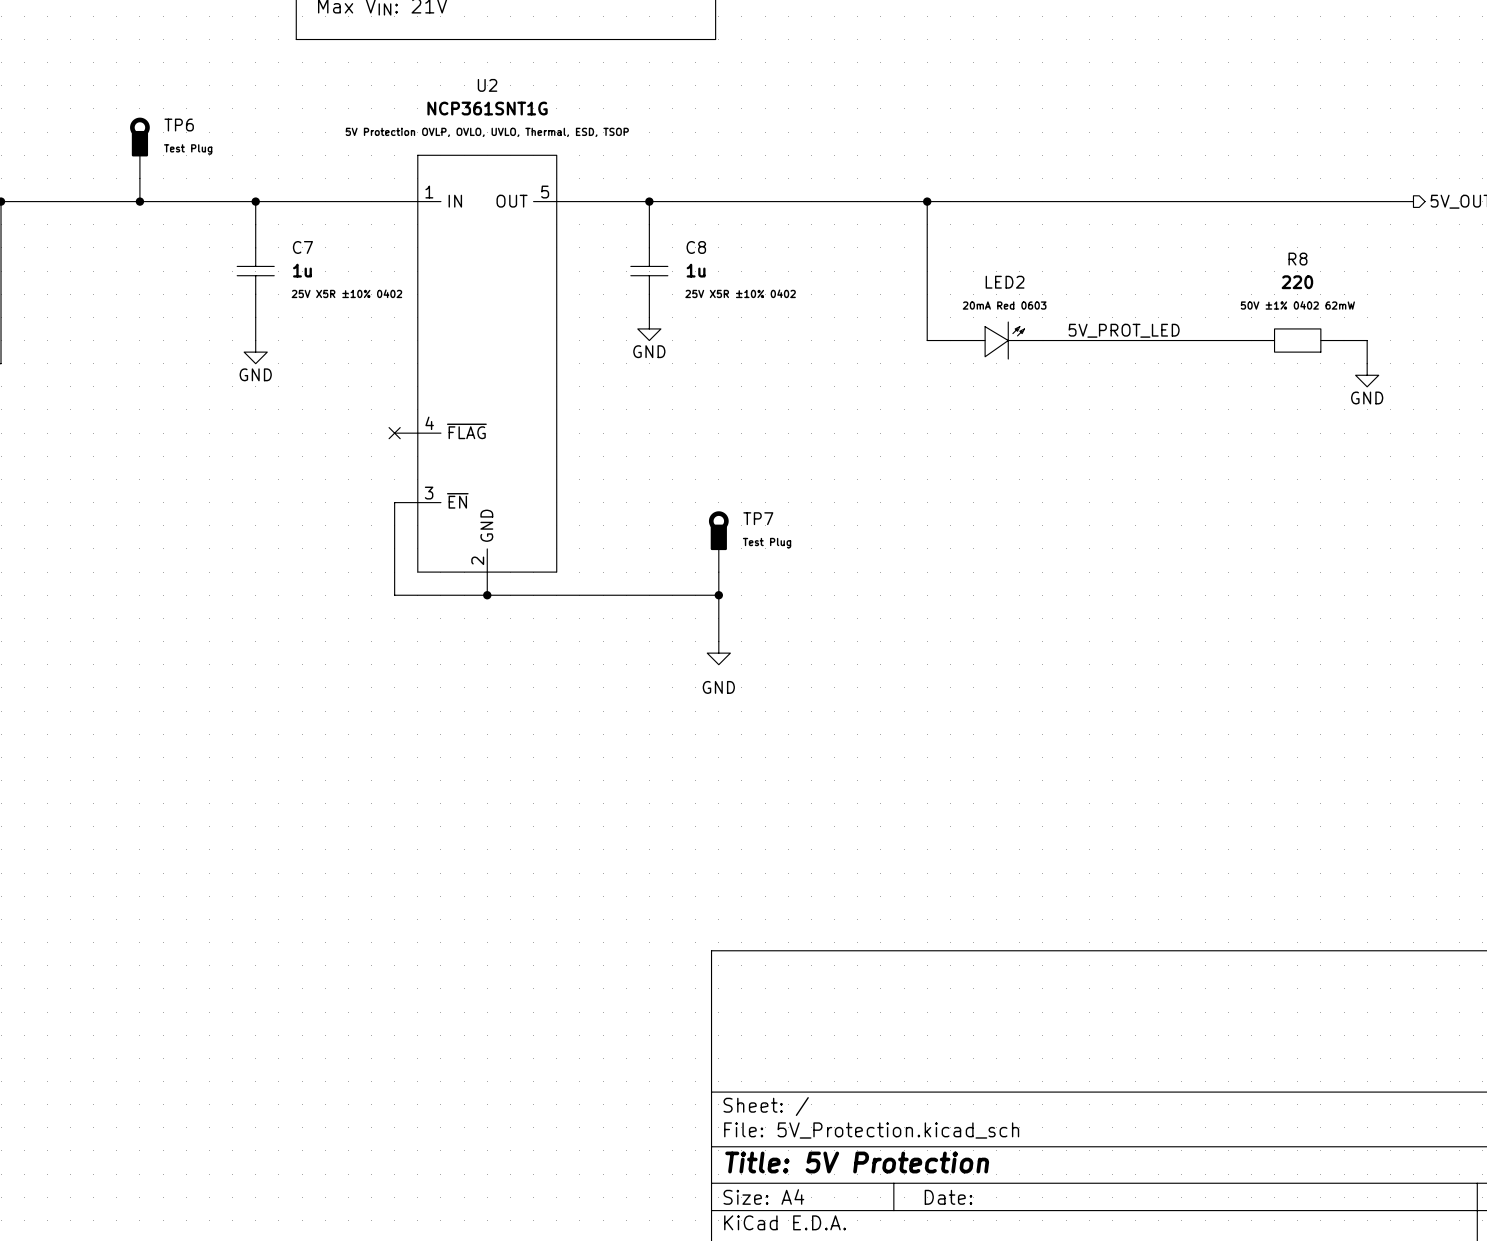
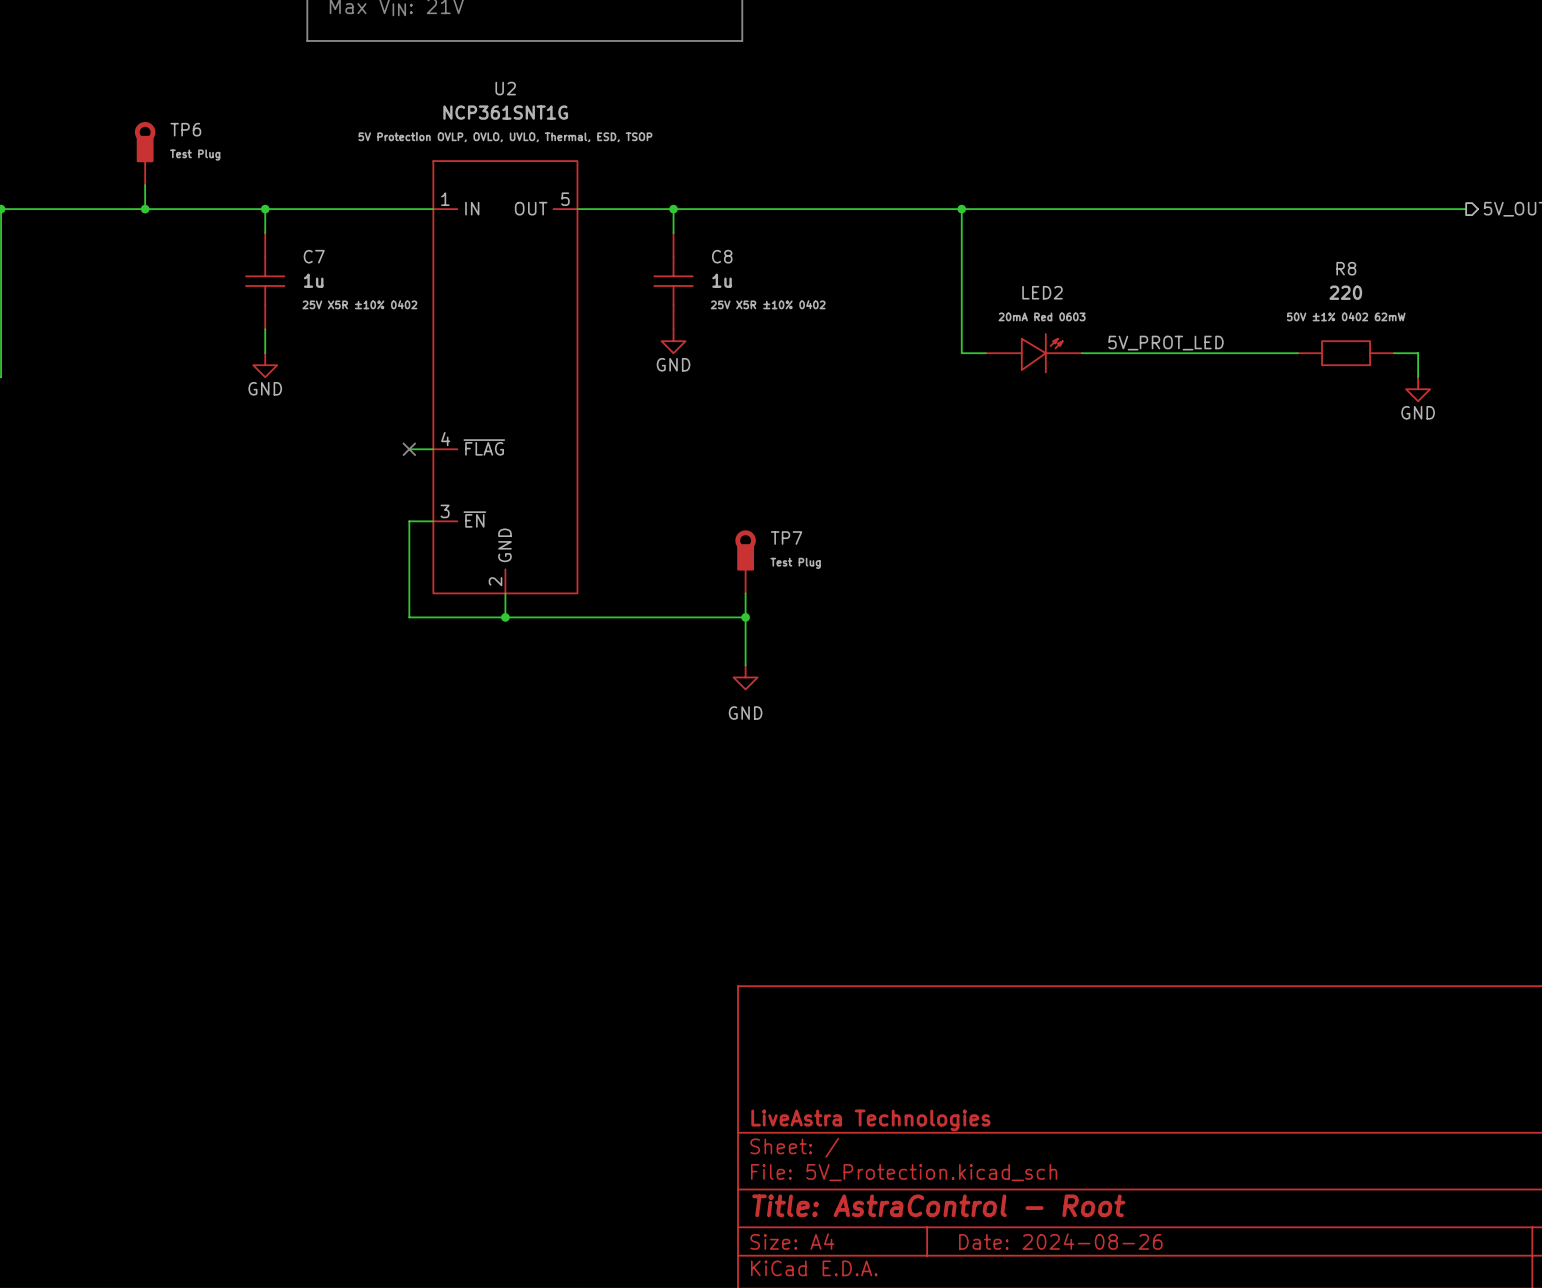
title block: none -> LiveAstra Technologies (870, 1120)
title block: Title: 5V Protection (857, 1162) -> Title: AstraControl - Root (938, 1205)
title block: Date: (948, 1197) -> Date: 2024-08-26 (1060, 1241)

